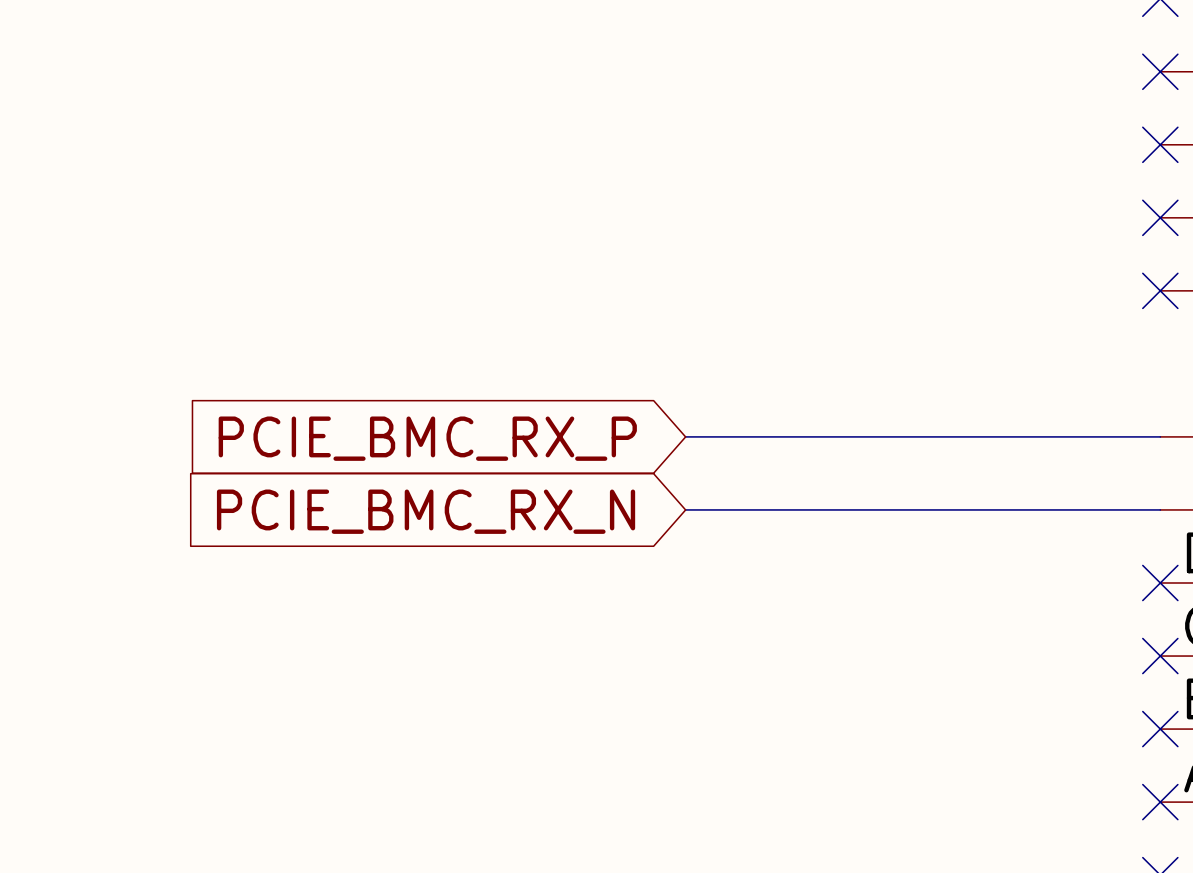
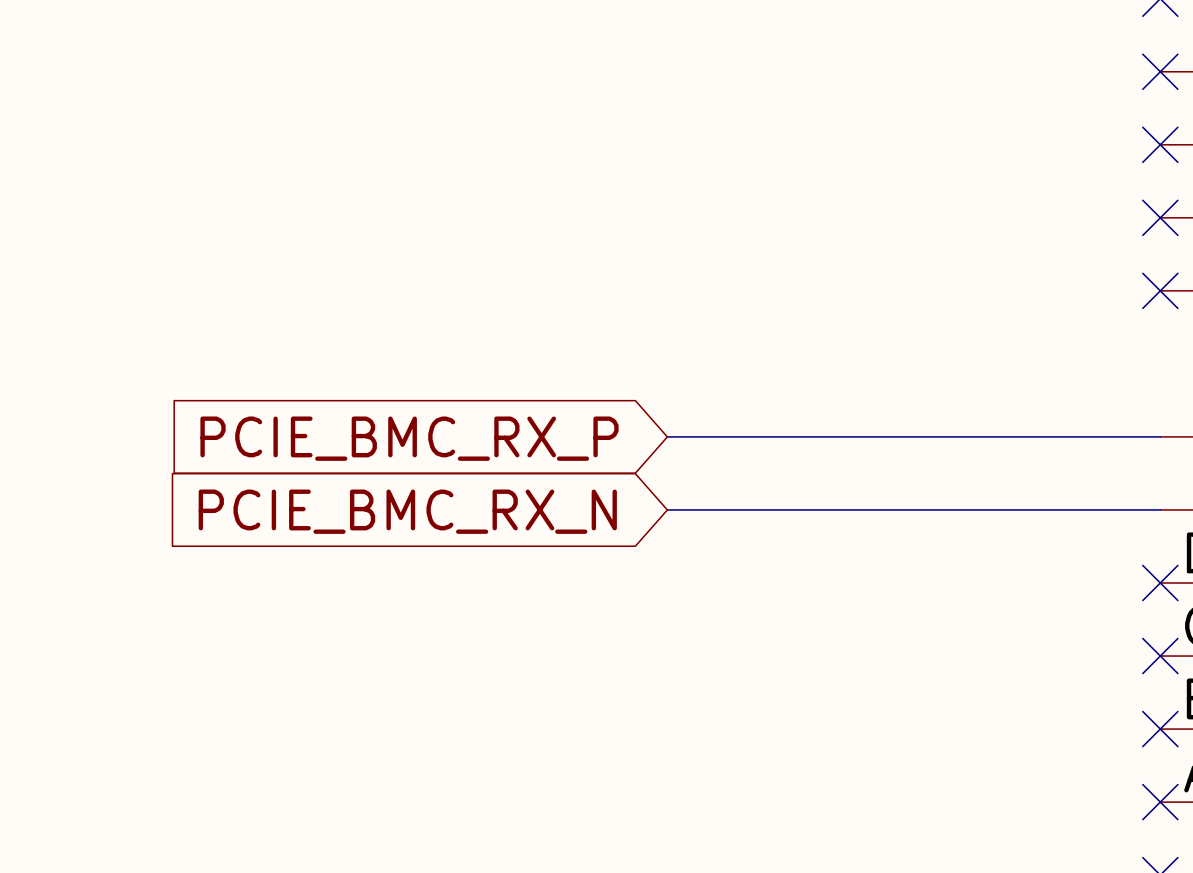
wire: none -> (667, 436) (685, 436)
global label position: PCIE_BMC_RX_P (427, 438) -> PCIE_BMC_RX_P (409, 438)
wire: none -> (667, 509) (685, 509)
global label position: PCIE_BMC_RX_N (426, 511) -> PCIE_BMC_RX_N (407, 511)

